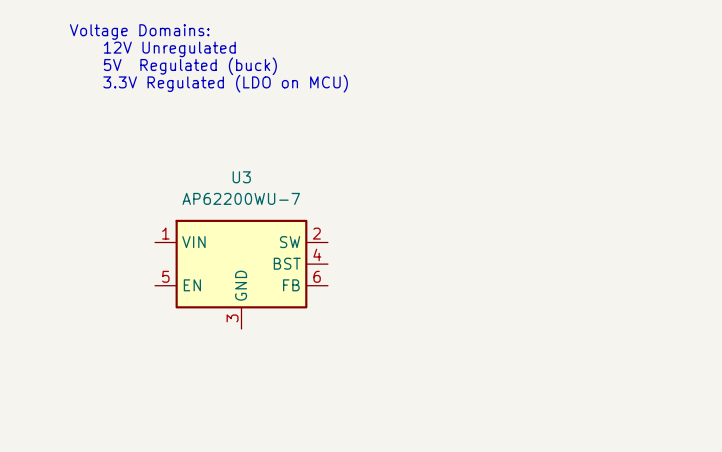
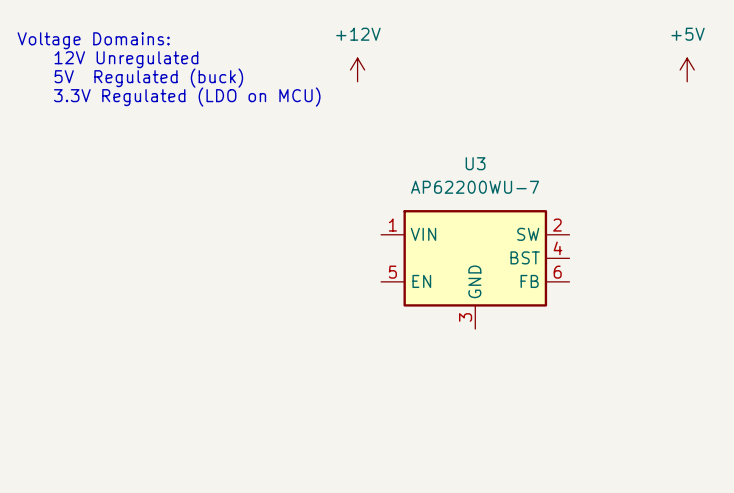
power symbol: none -> +12V (357, 69)
power symbol: none -> +5V (687, 69)
U3 position: (241, 274) -> (475, 269)

